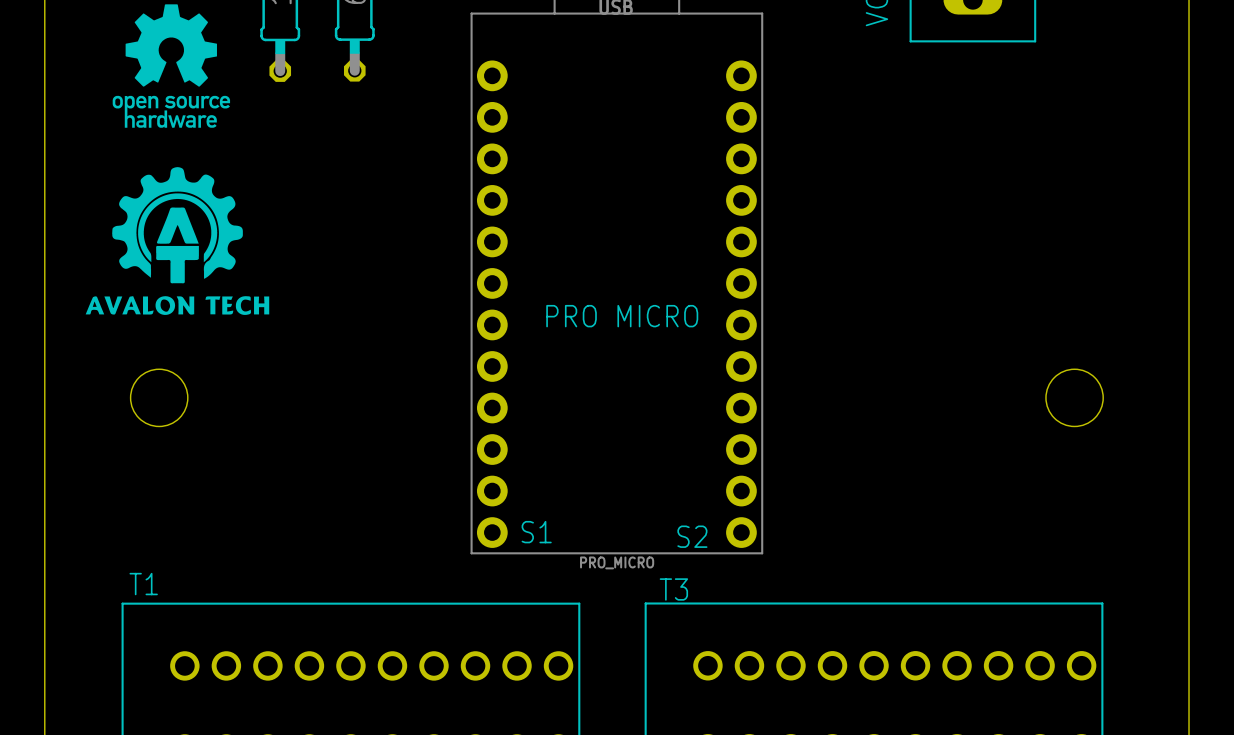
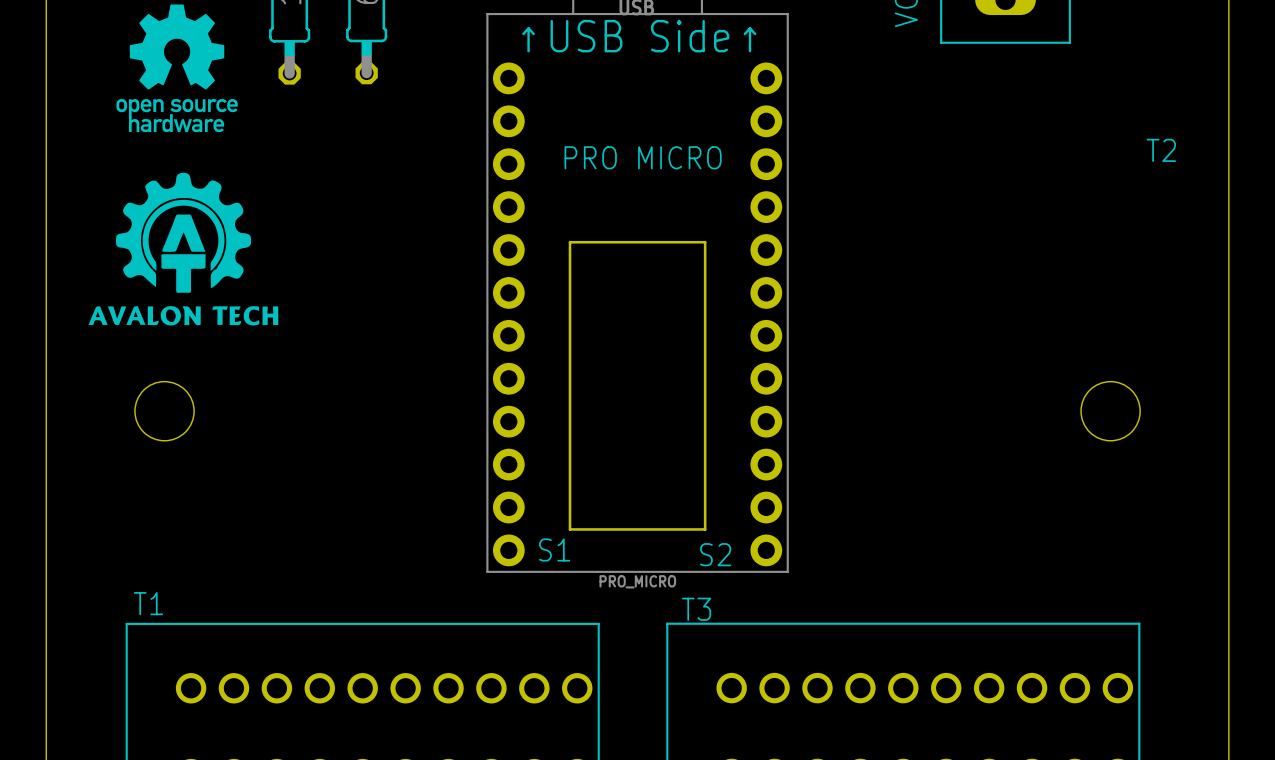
text: none -> ↑USB Side↑ (639, 36)
text: none -> T2 (1161, 150)
board edge: none -> (570, 242) (570, 529) (705, 529) (705, 242) (570, 242)
text position: PRO MICRO (622, 316) -> PRO MICRO (643, 157)

